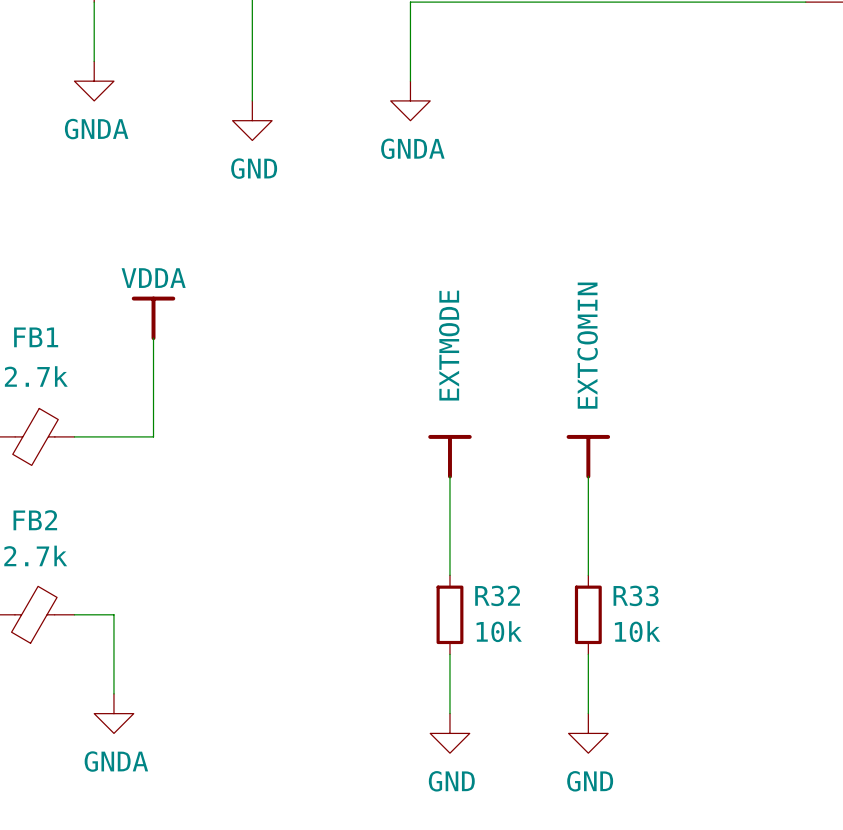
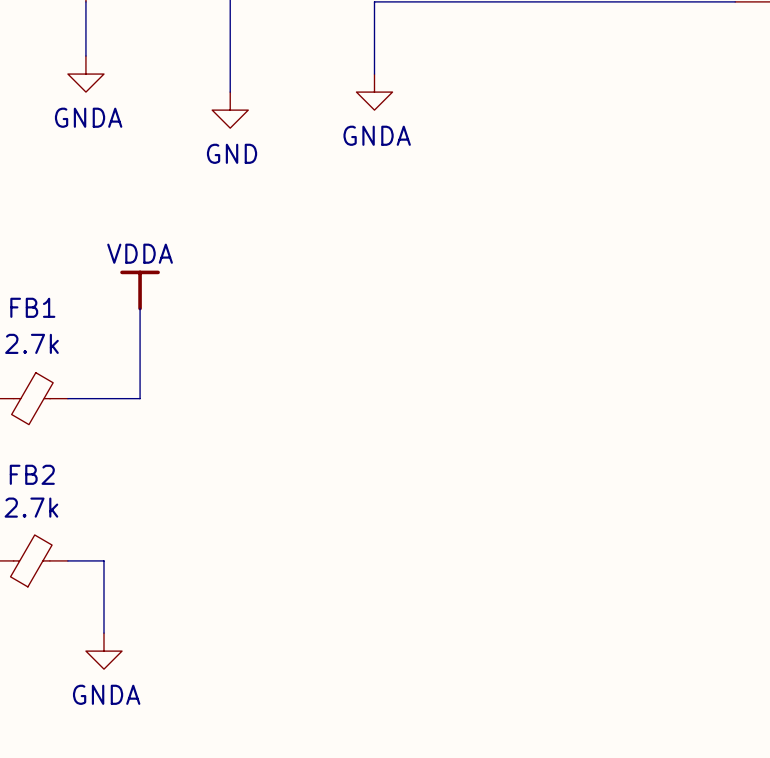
power symbol: EXTMODE (449, 456) -> none
power symbol: EXTCOMIN (588, 456) -> none
wire: (449, 476) (449, 575) -> none
wire: (588, 476) (588, 575) -> none
R32: 10k (449, 614) -> none
R33: 10k (588, 614) -> none
wire: (449, 654) (449, 713) -> none
wire: (588, 654) (588, 713) -> none
power symbol: GND (449, 733) -> none
power symbol: GND (588, 733) -> none

